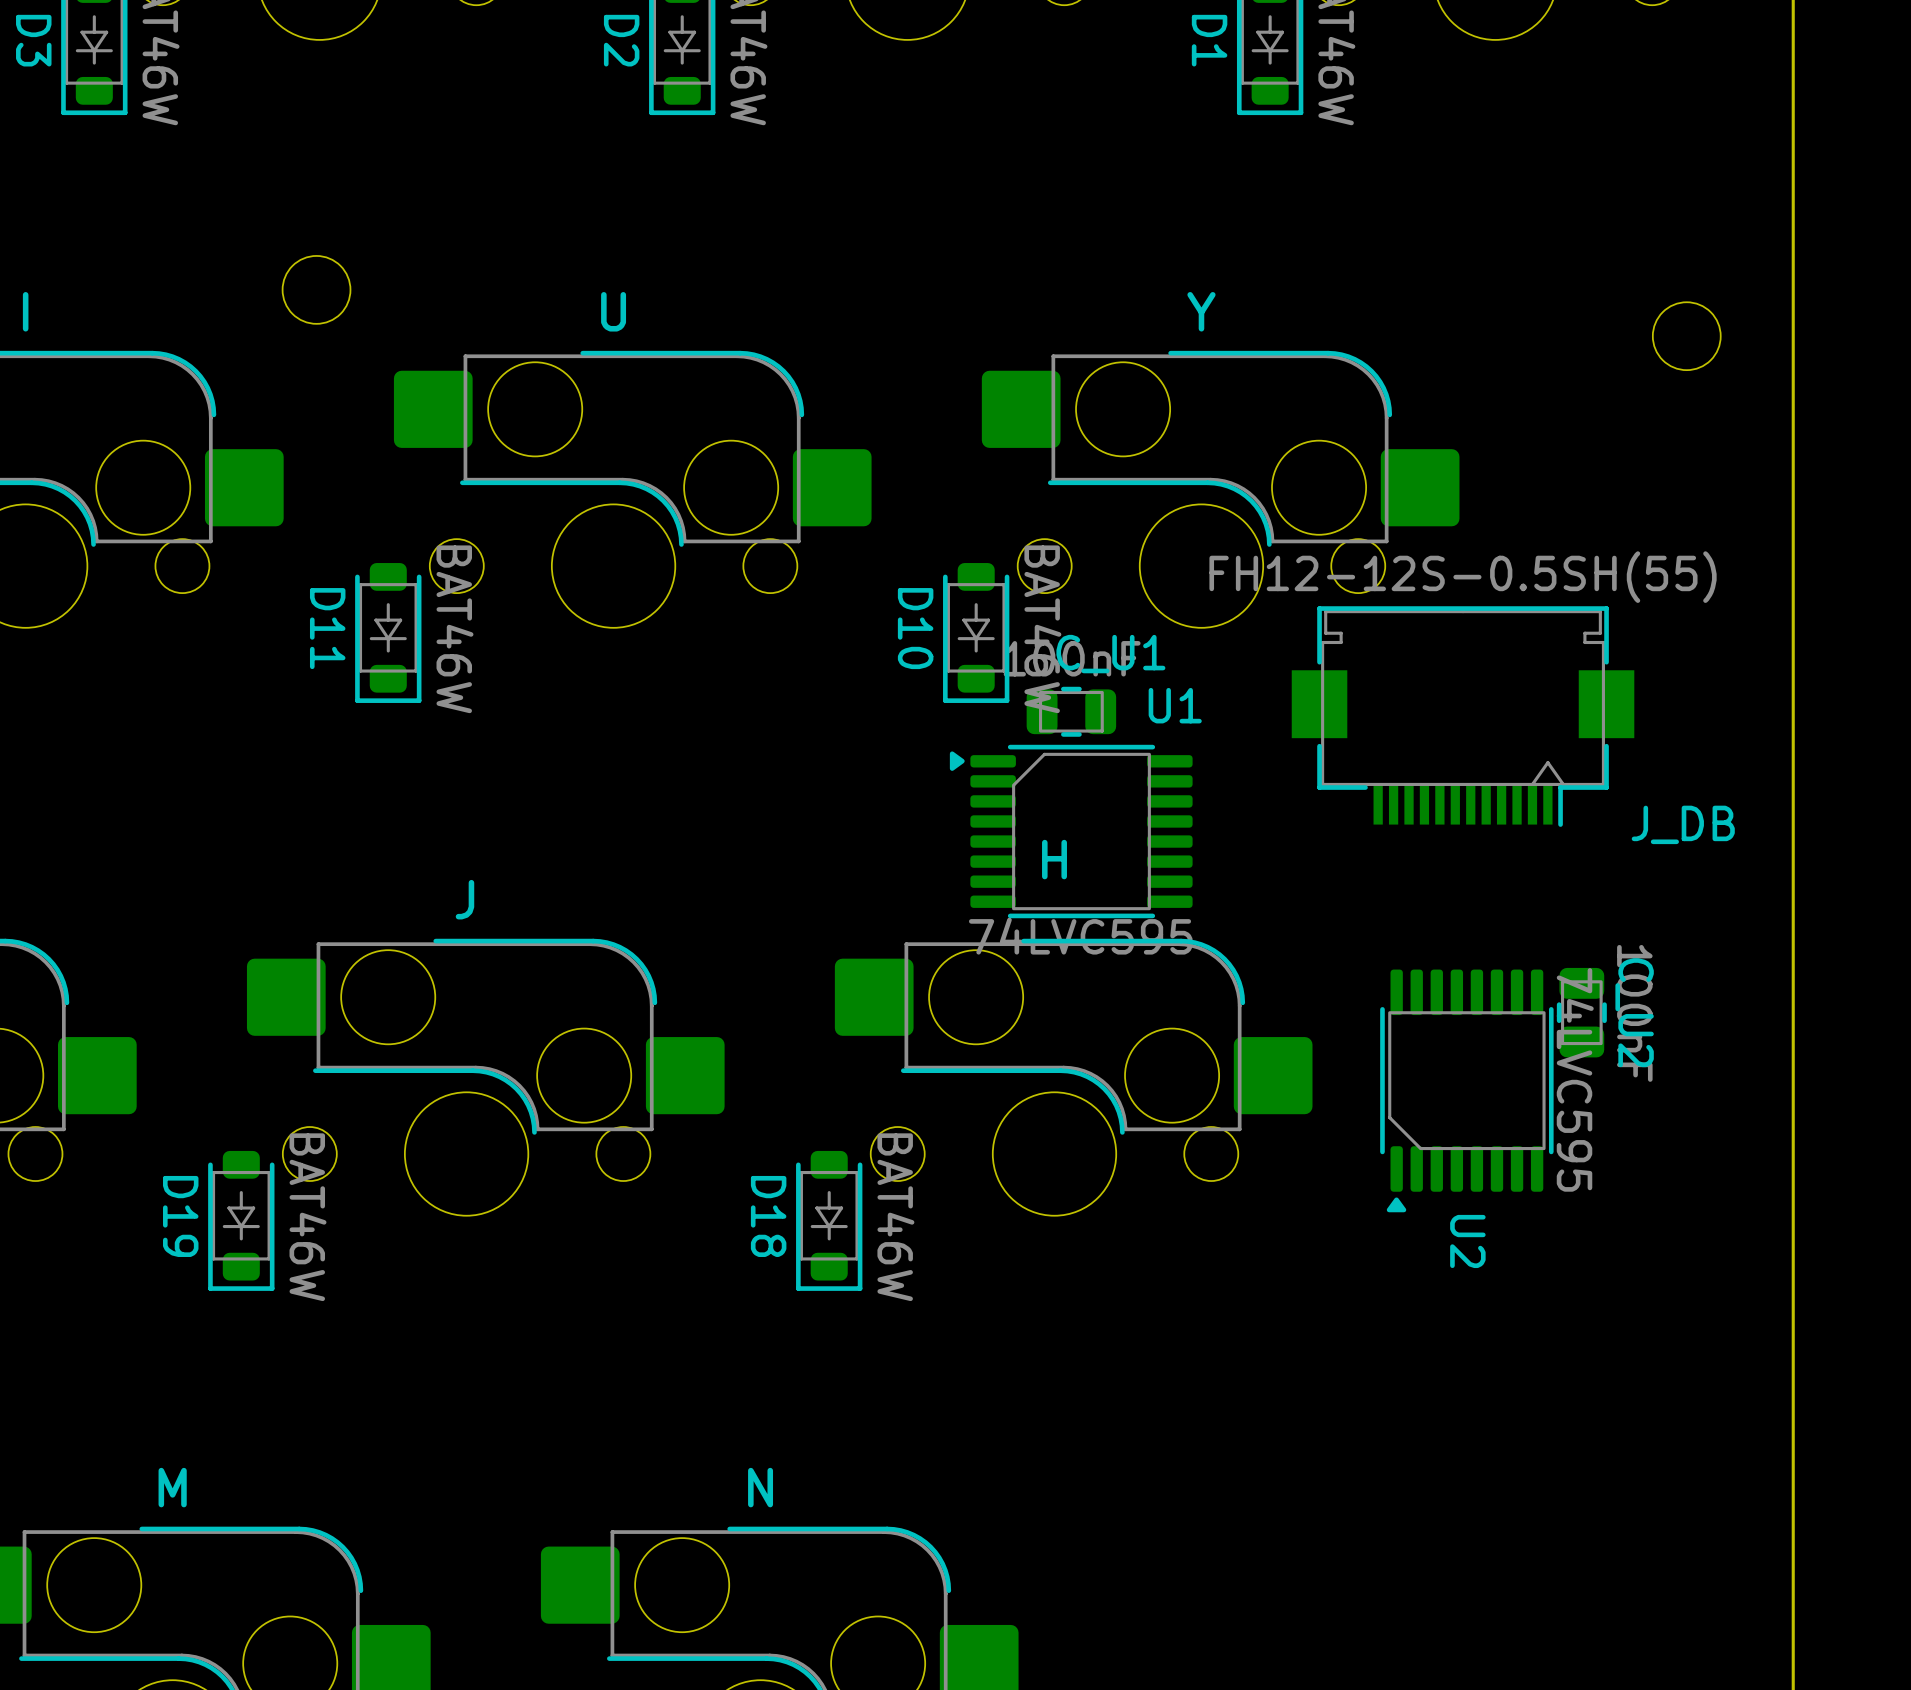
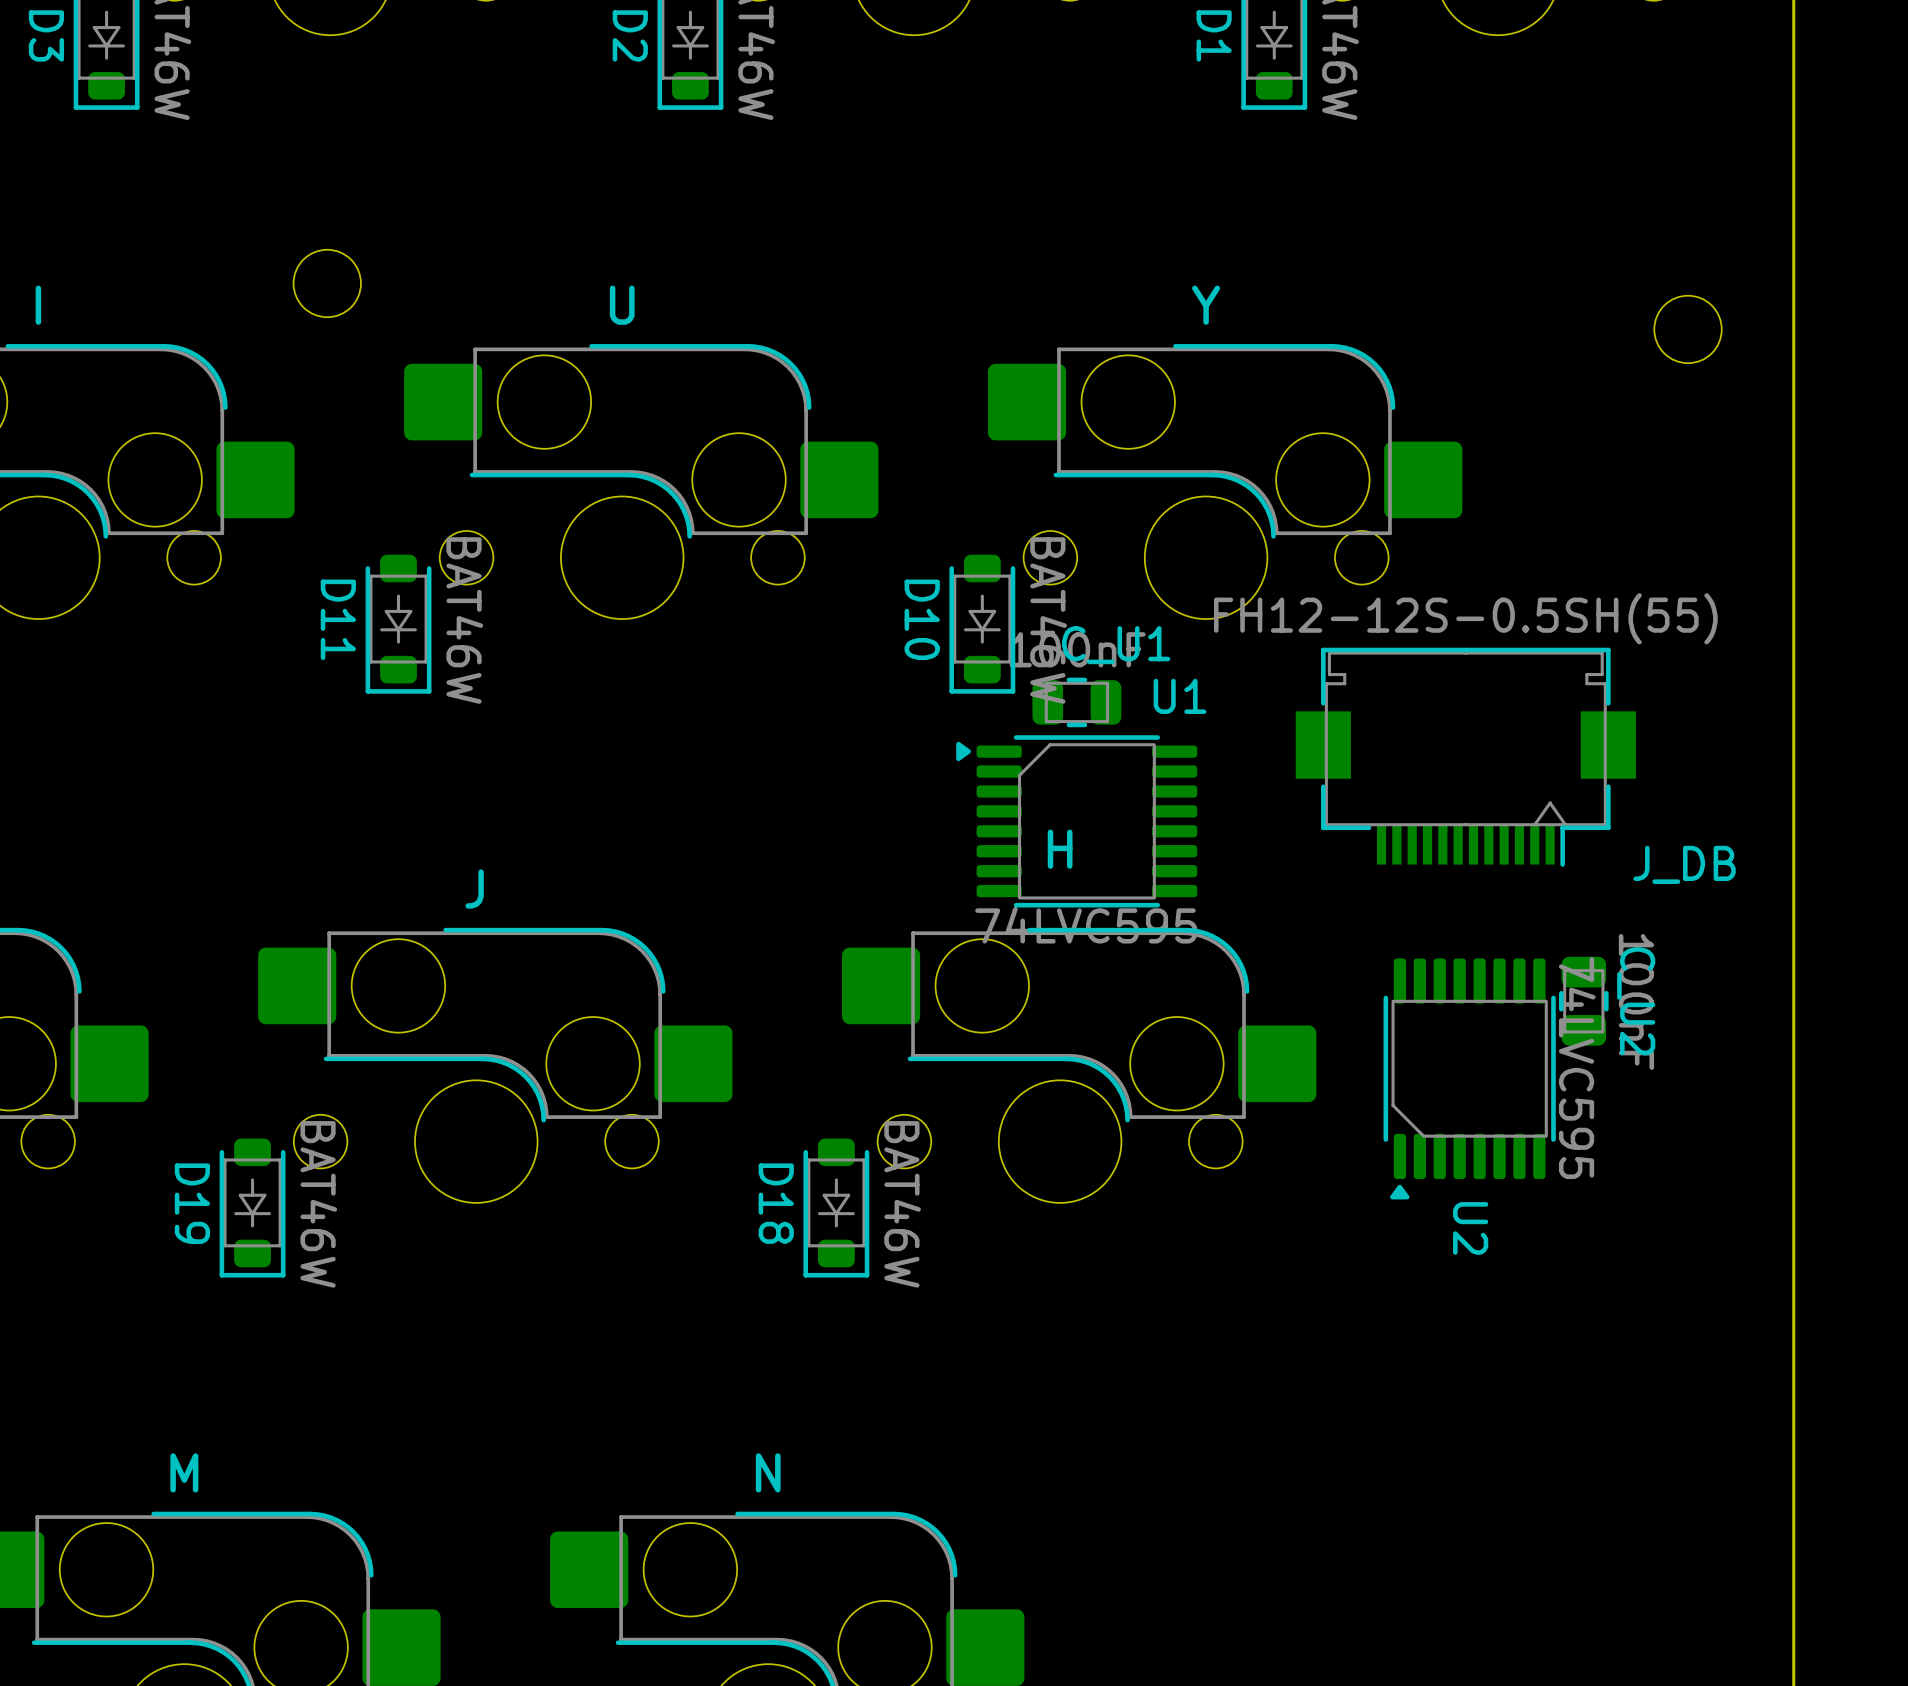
J_DB position: (1463, 716) -> (1465, 757)

